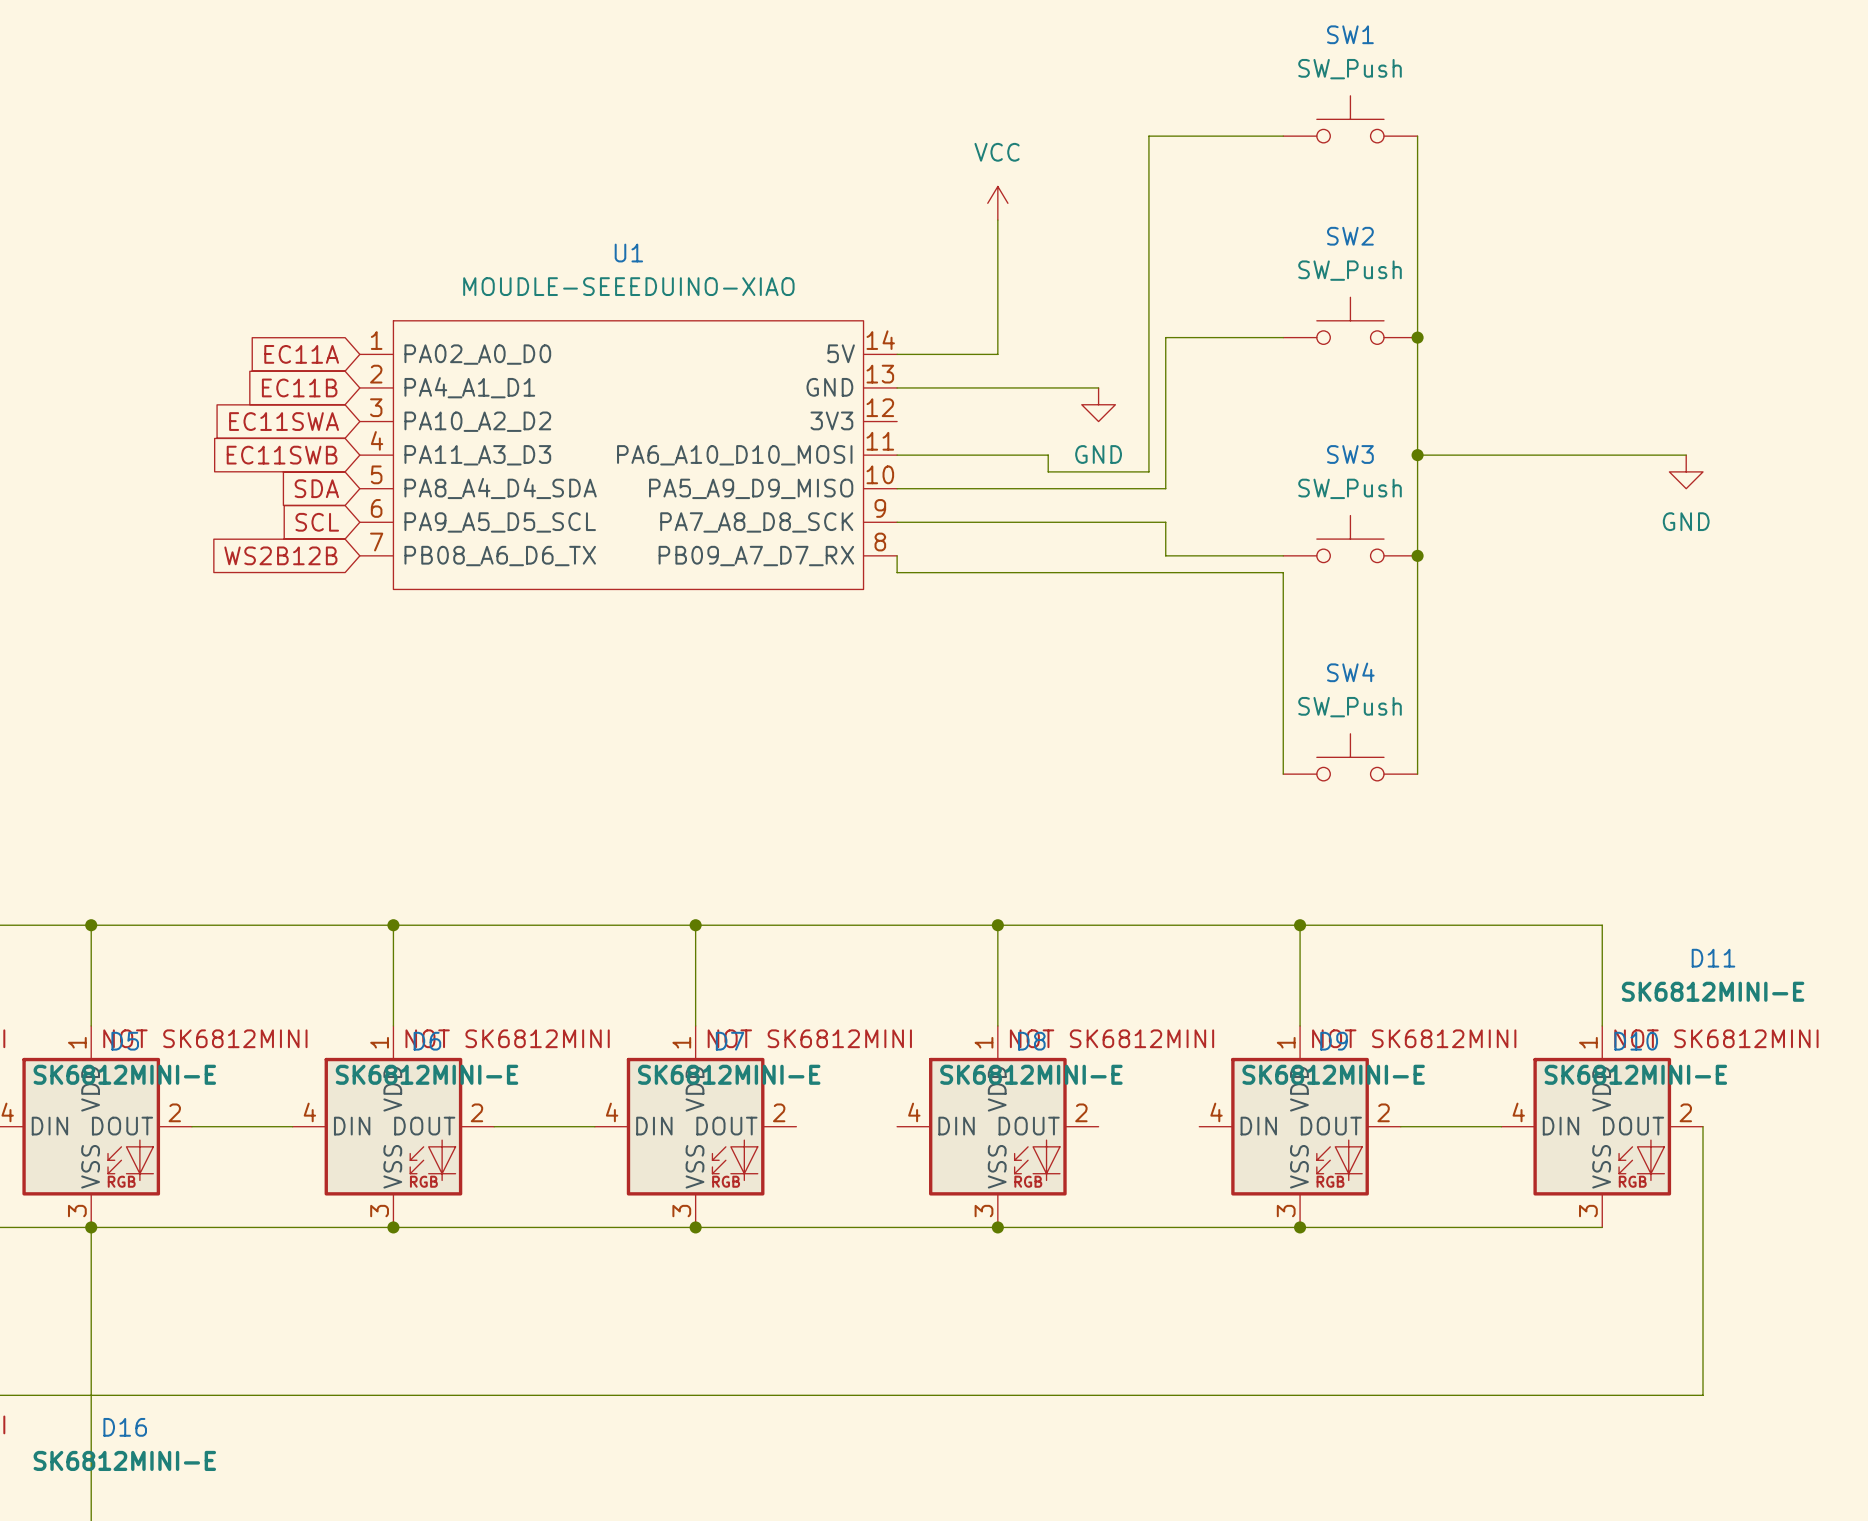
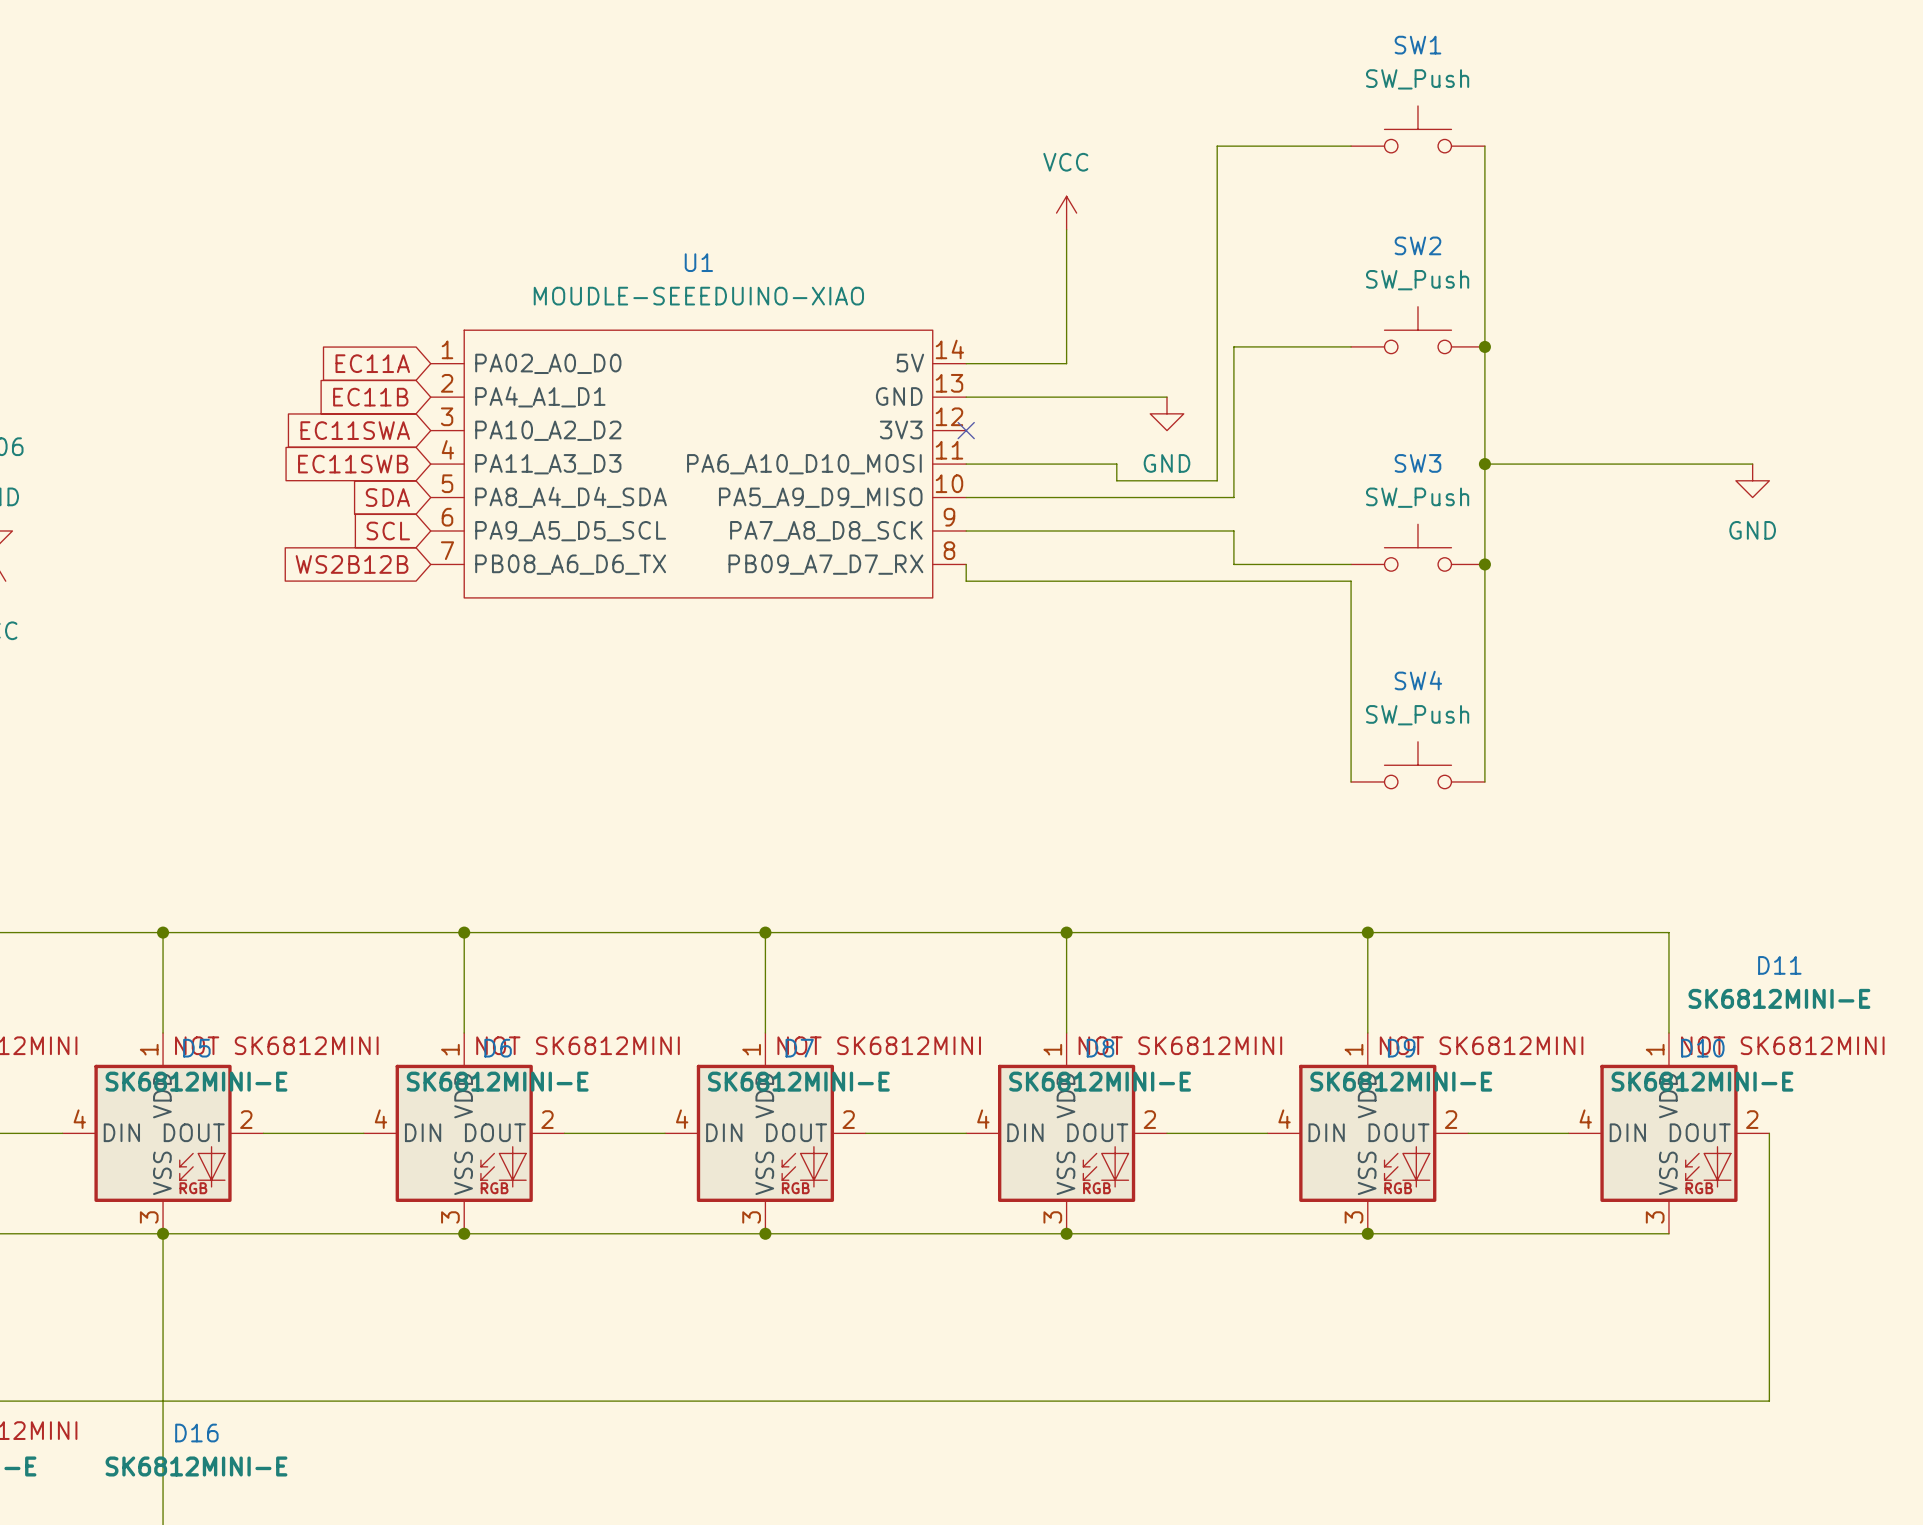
no-connect mark: none -> (966, 430)
wire: none -> (865, 1133) (966, 1133)
wire: none -> (1166, 1133) (1267, 1133)

